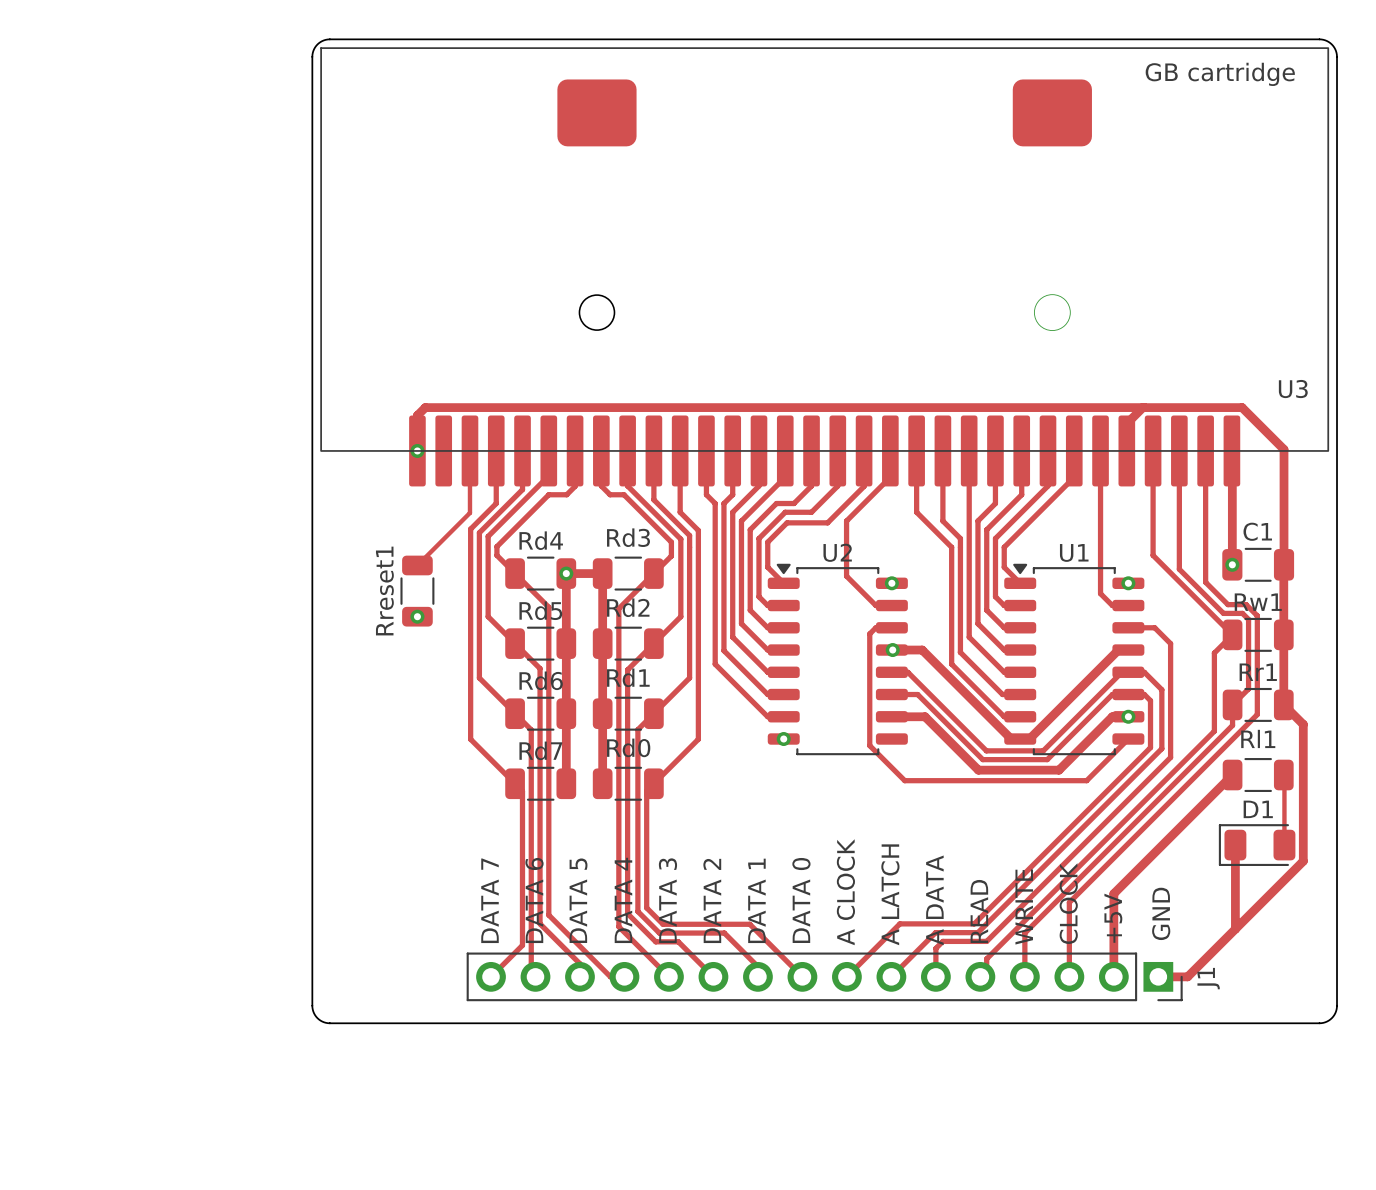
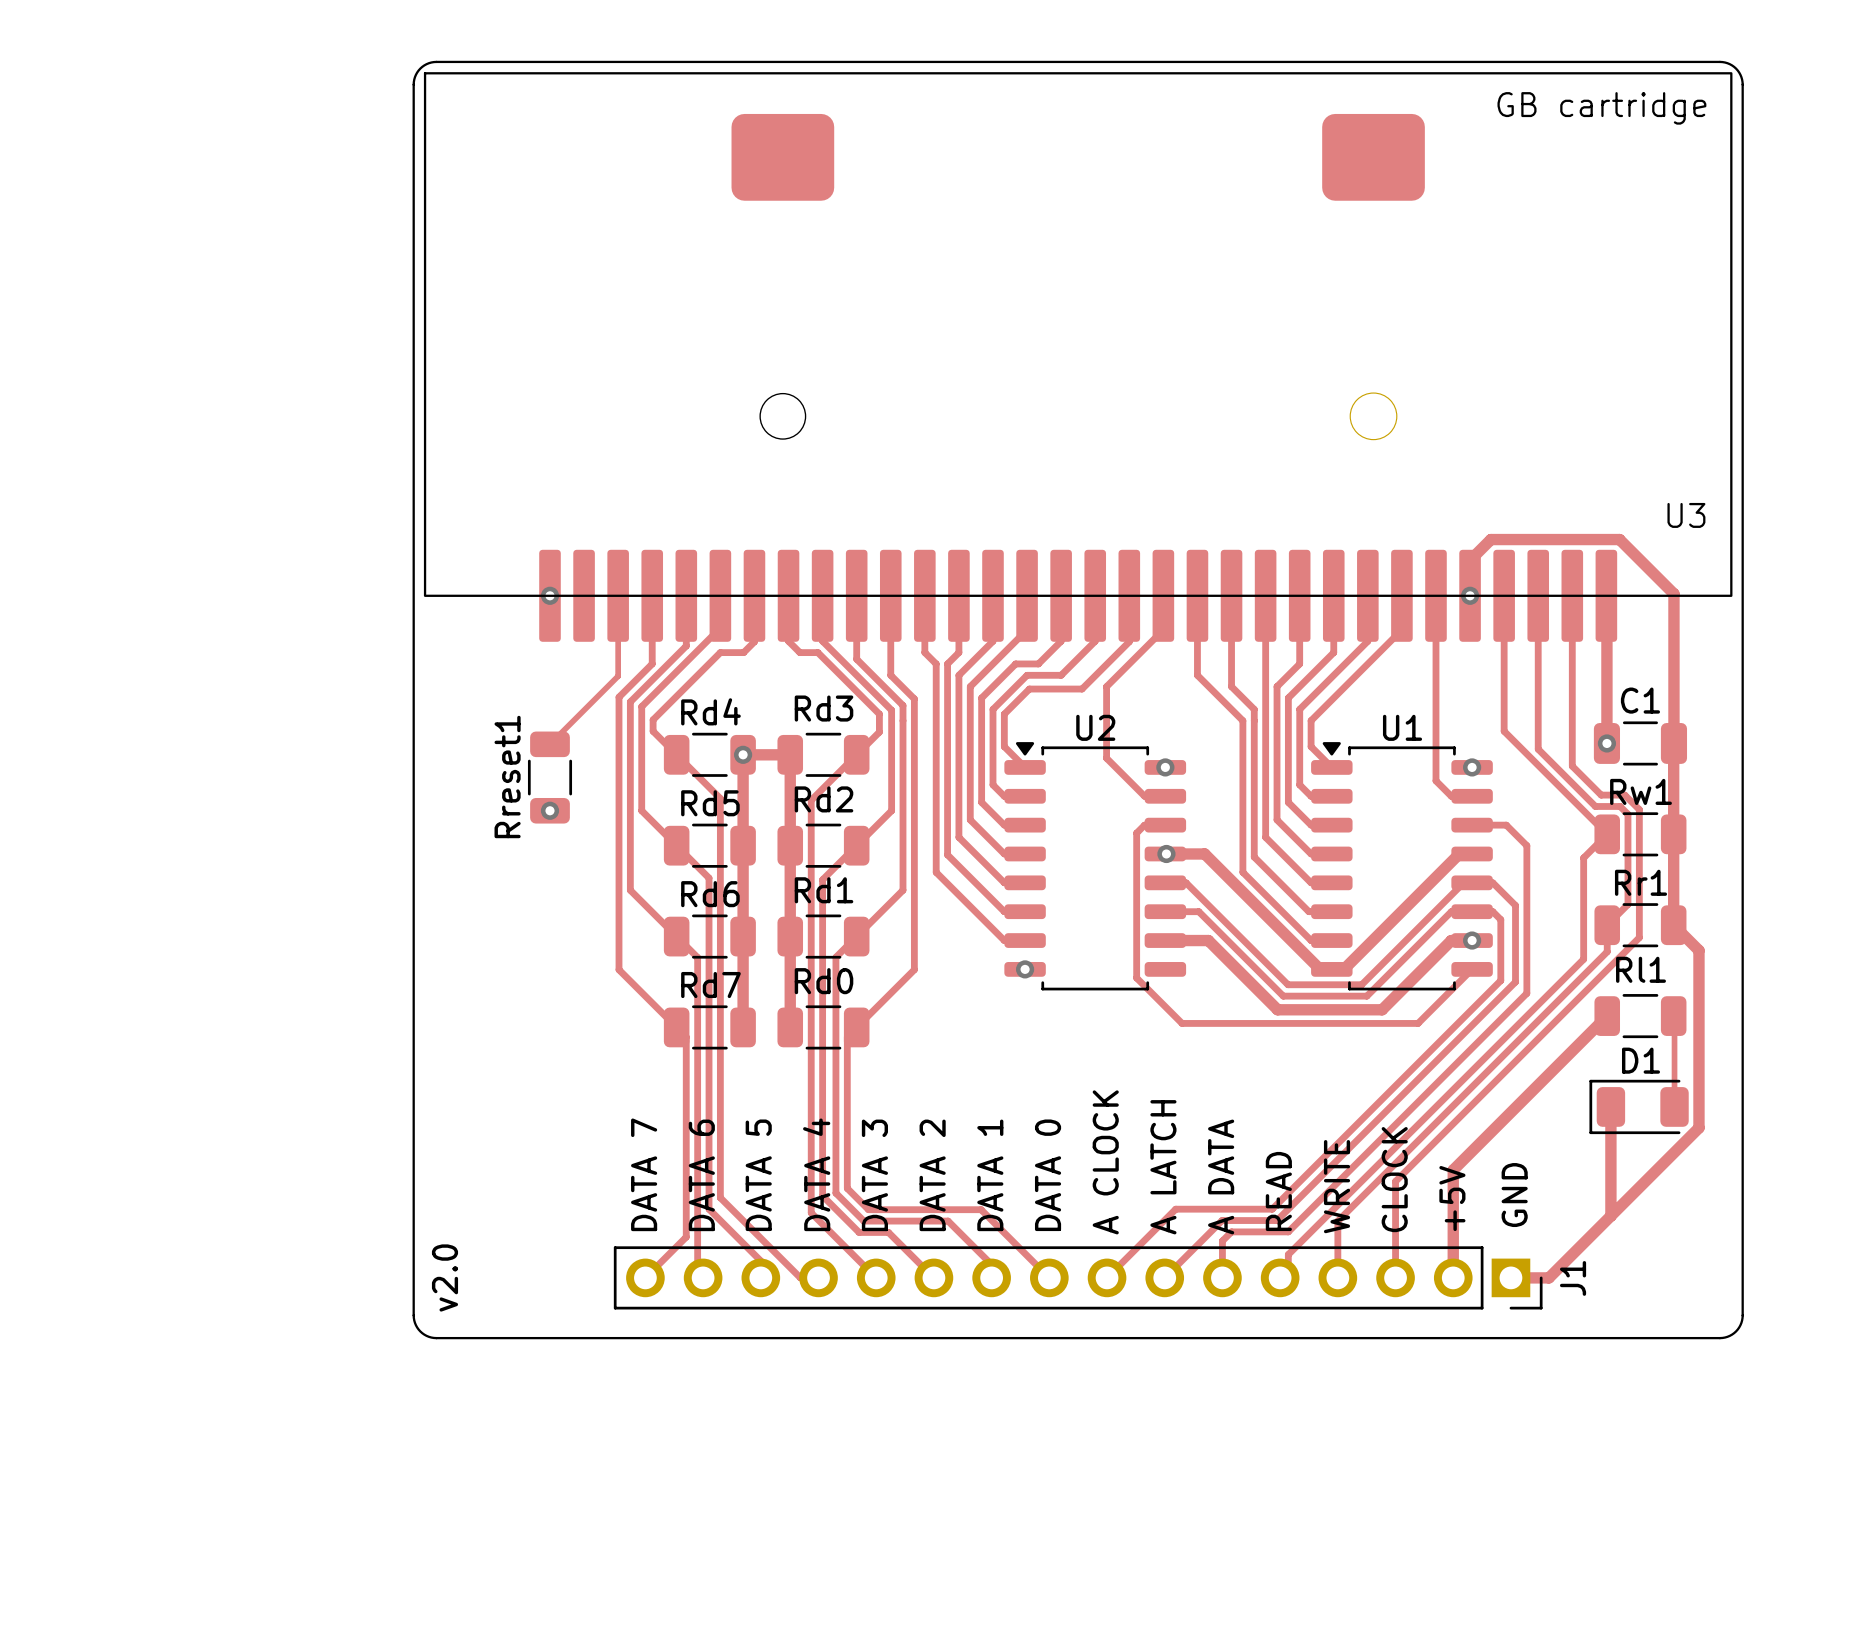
track: (1142, 407) (425, 407) (417, 415) (417, 450) -> none
via: none -> (1470, 595)
text: none -> v2.0 (444, 1277)

